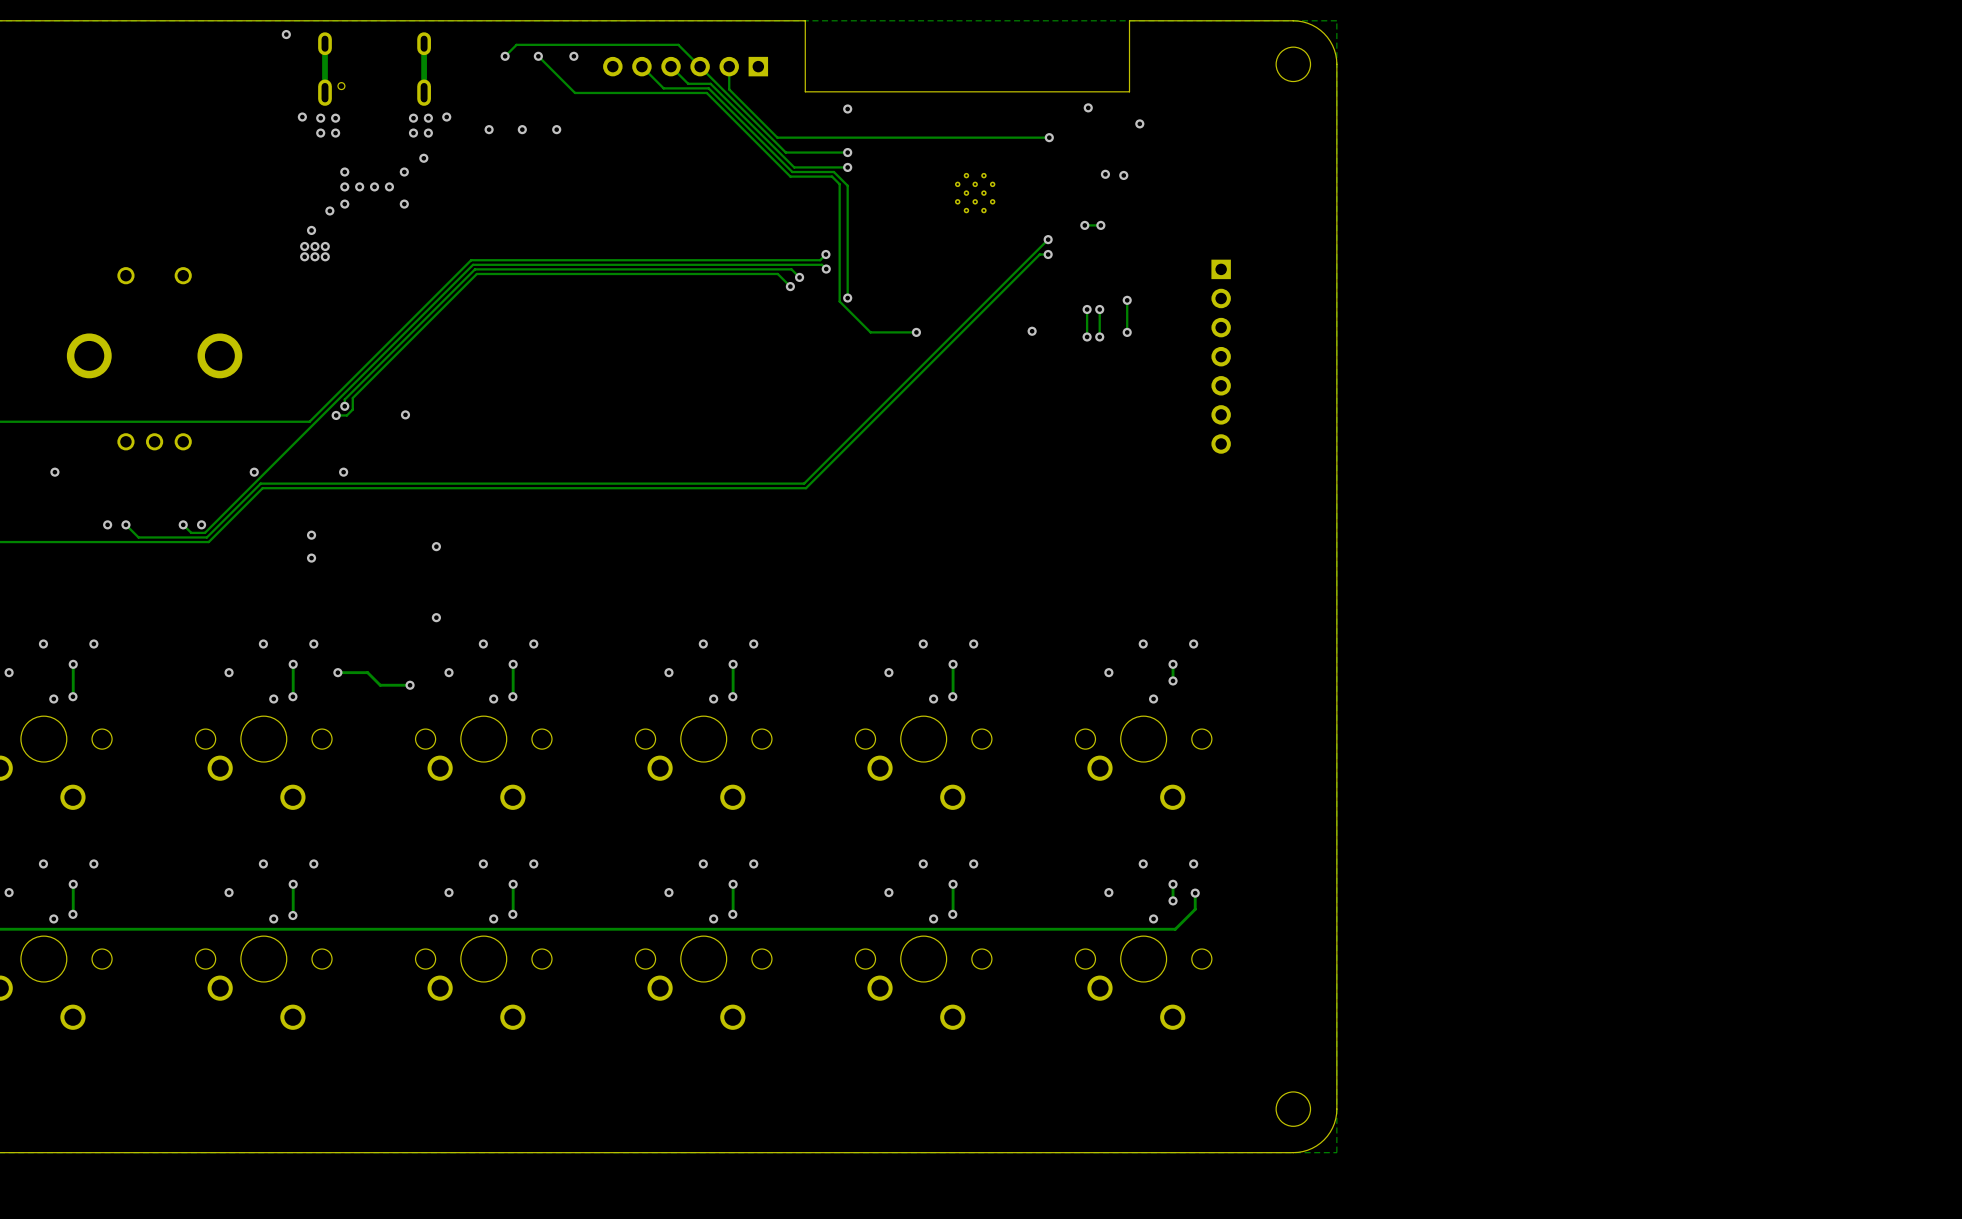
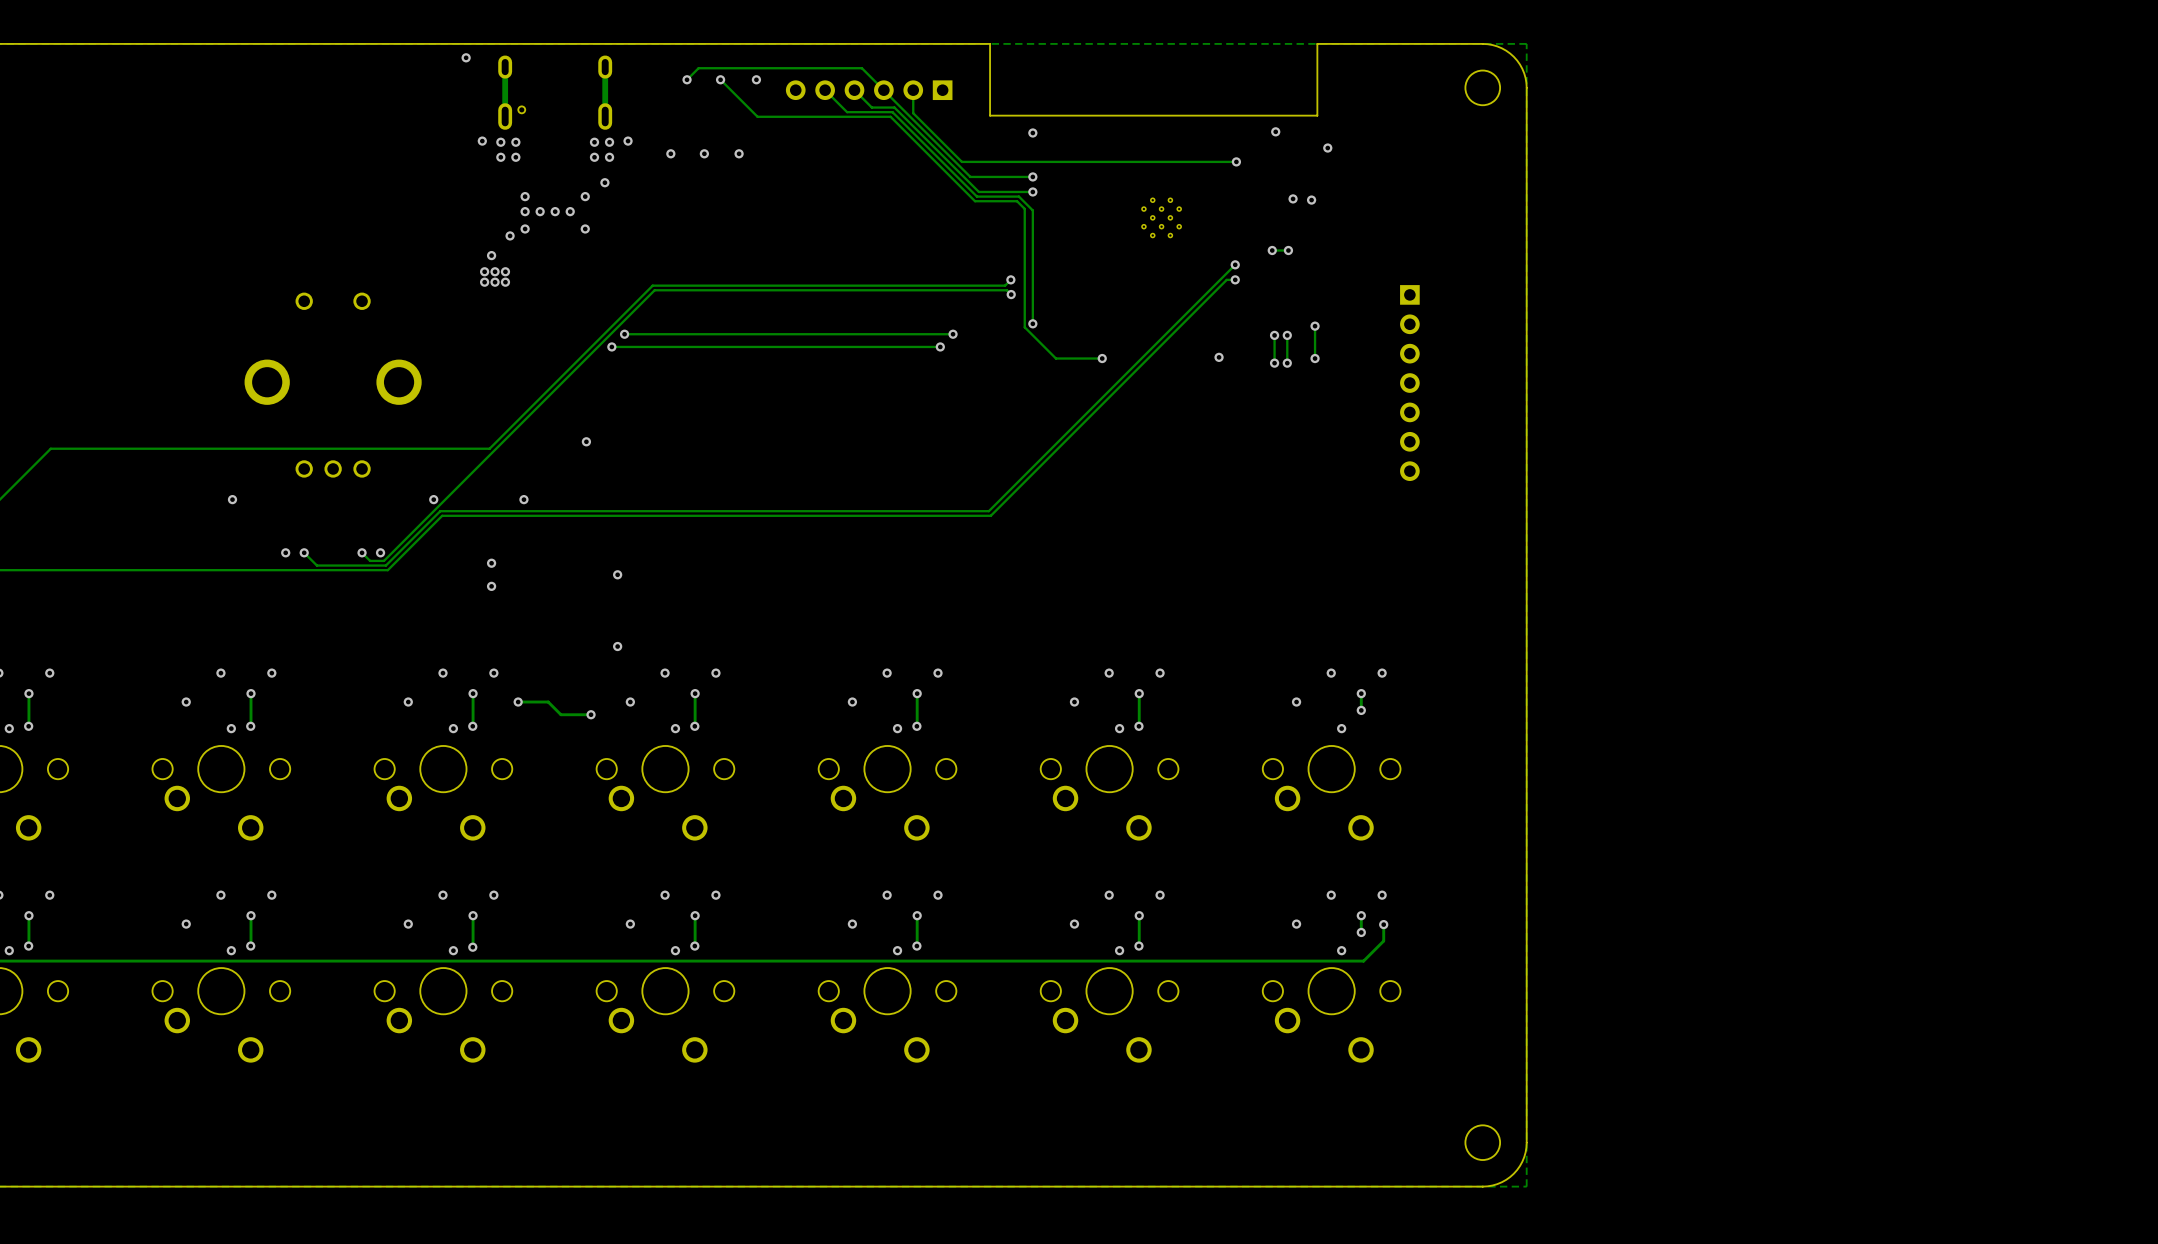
track: (799, 277) (791, 269) (474, 269) (344, 399) (344, 406) -> none
via: (799, 277) -> none
track: (790, 286) (777, 273) (476, 273) (352, 398) (352, 409) (346, 415) (336, 415) -> none
via: (790, 286) -> none
via: none -> (624, 334)
track: none -> (953, 334) (624, 334)
via: none -> (953, 334)
via: none -> (611, 346)
track: none -> (940, 346) (611, 346)
via: none -> (940, 346)
via: (344, 406) -> none
via: (336, 415) -> none

